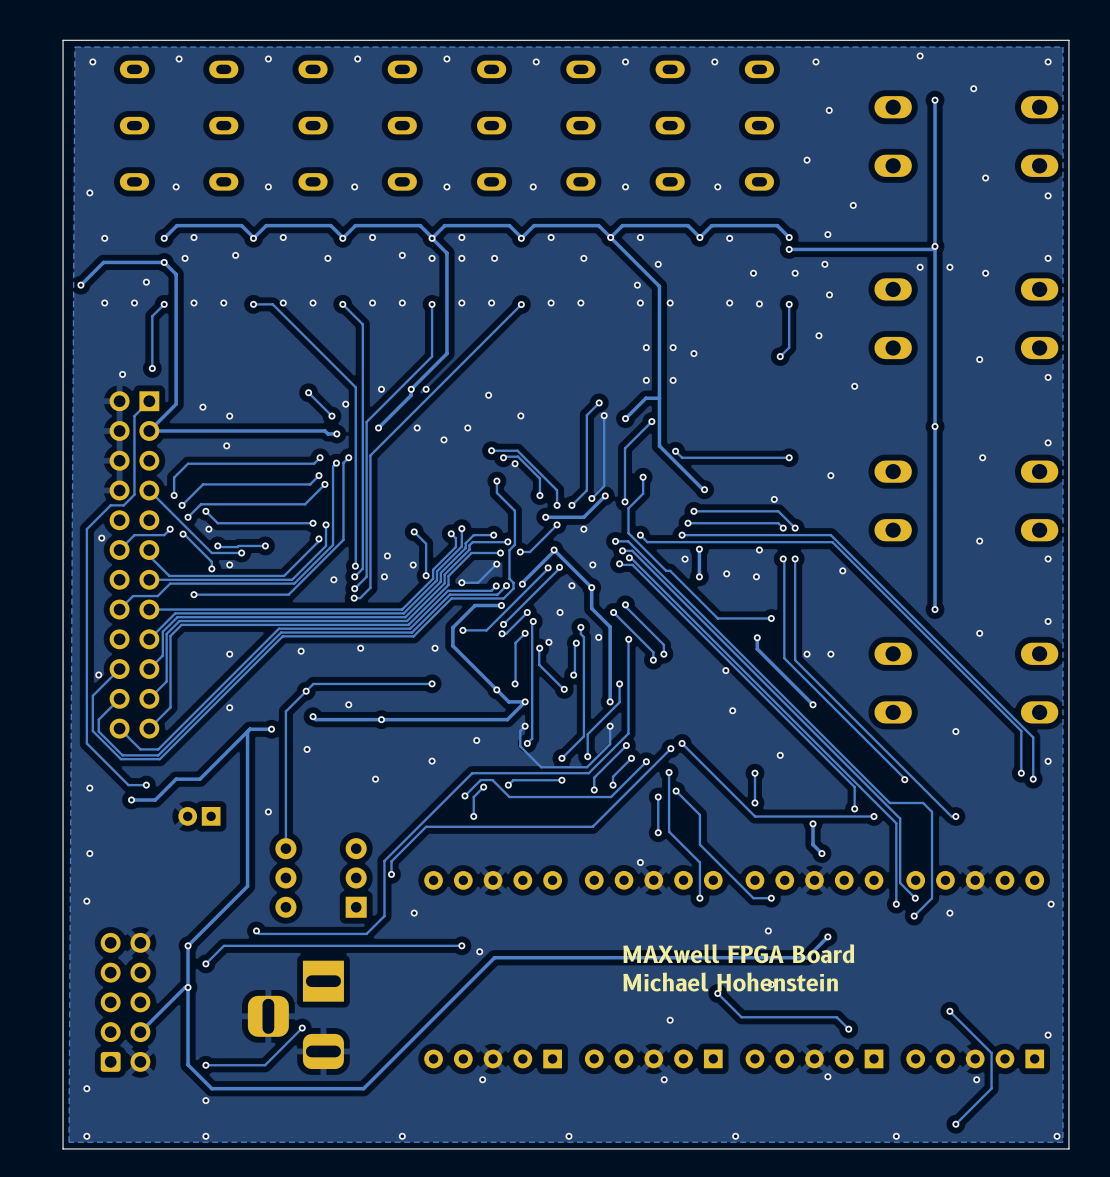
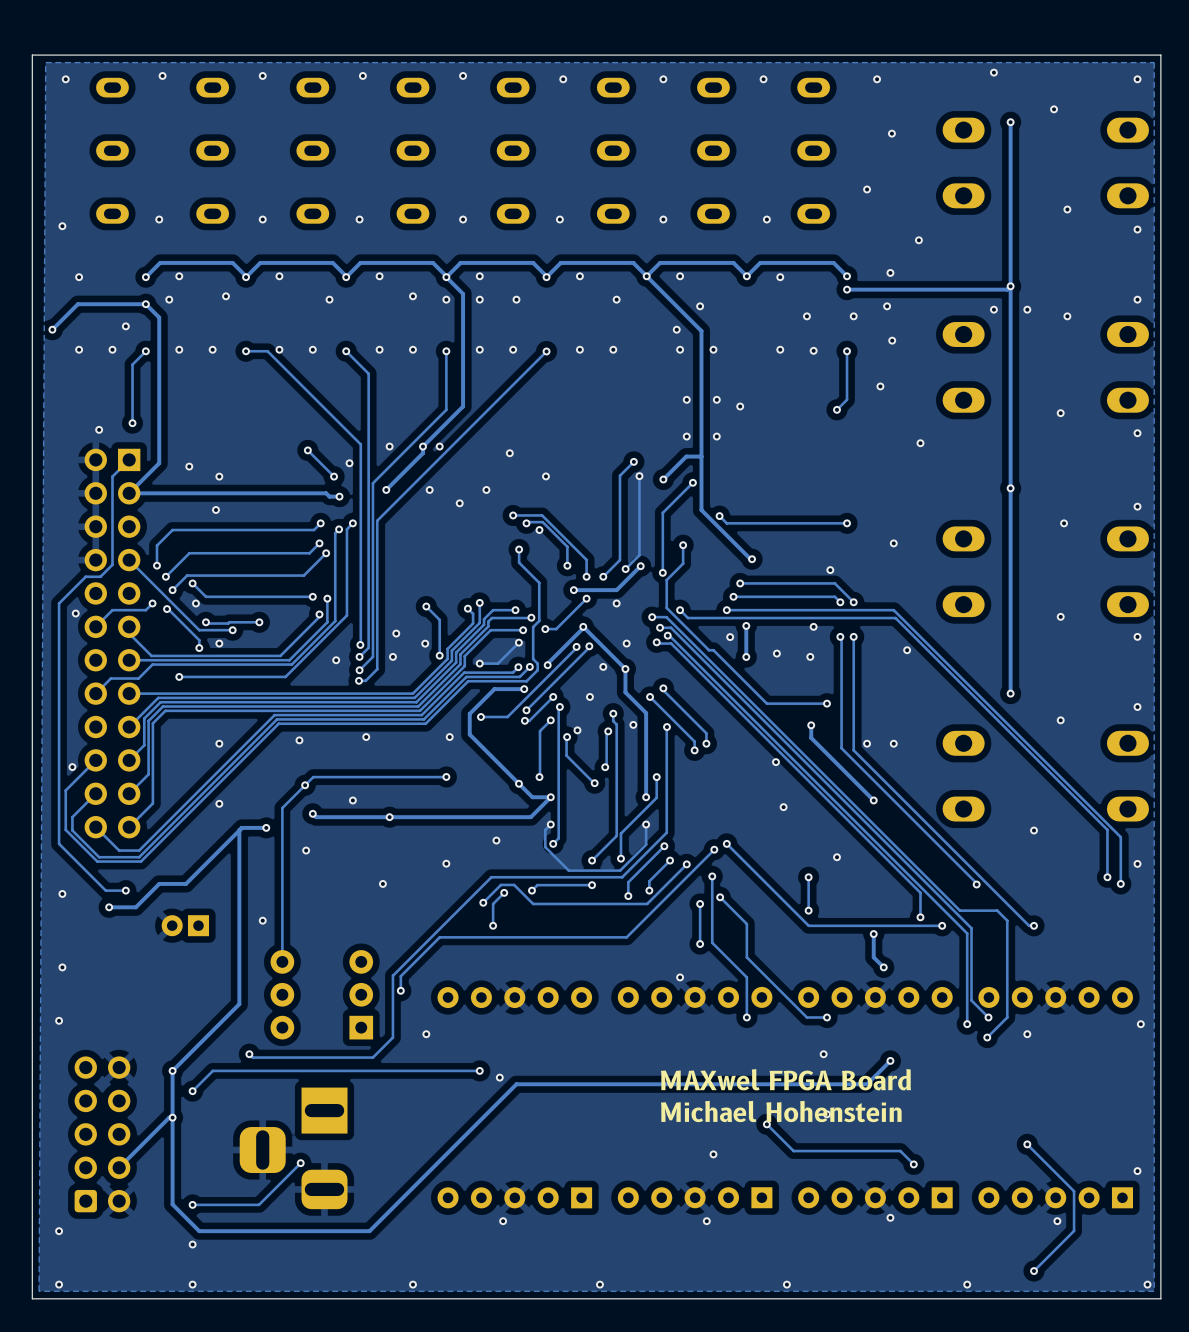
text: MAXwell FPGA Board (738, 953) -> MAXwel FPGA Board (785, 1079)

